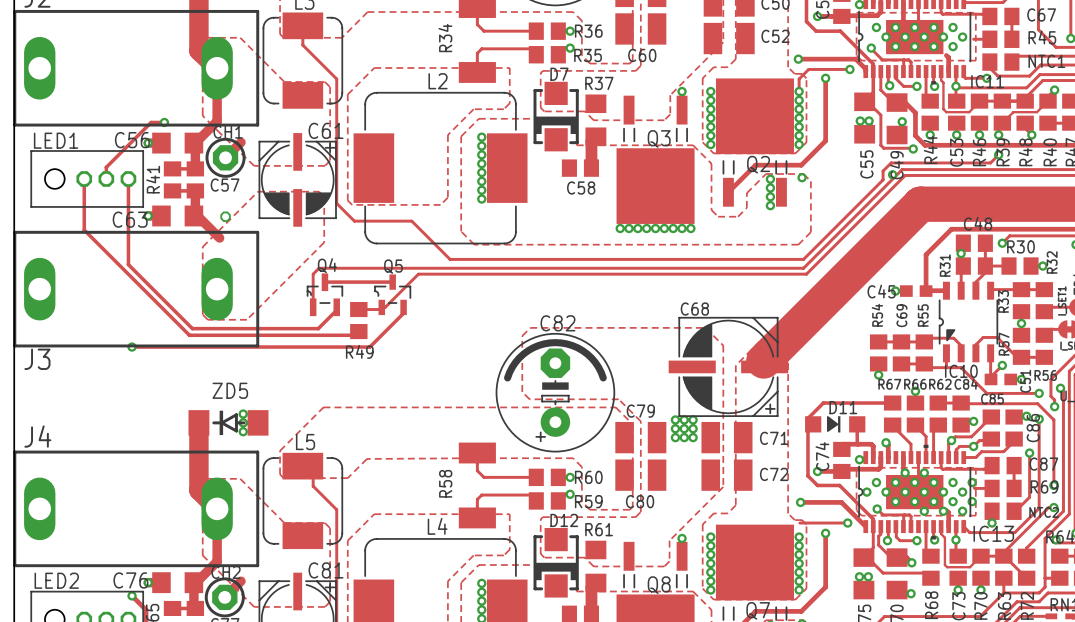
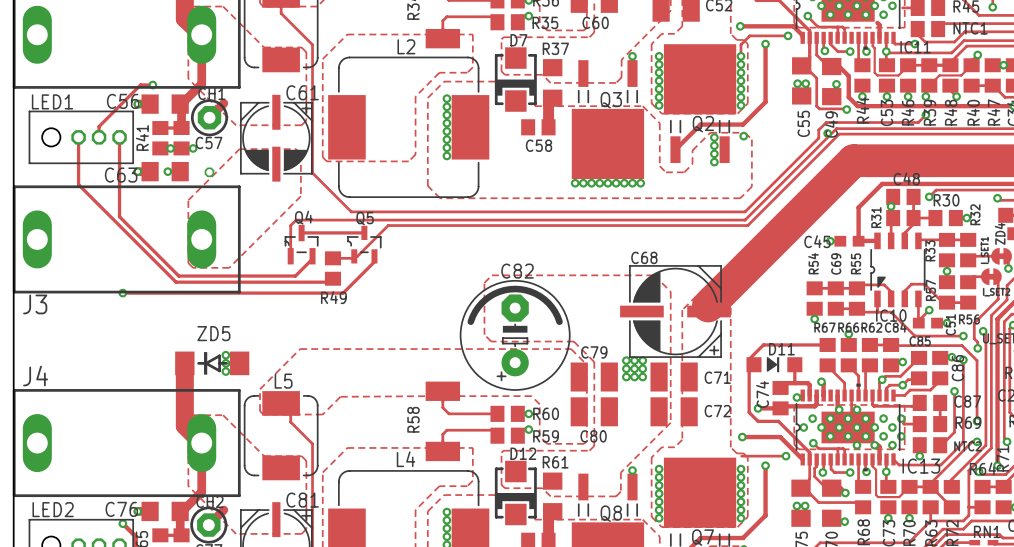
via: none -> (170, 148)
track: (195, 190) (193, 215) (196, 214) (219, 238) -> none
via: none -> (193, 148)
track: (336, 203) (354, 221) (411, 221) (450, 259) -> (312, 160) (312, 173) (351, 211) (417, 211)
via: none -> (167, 171)

